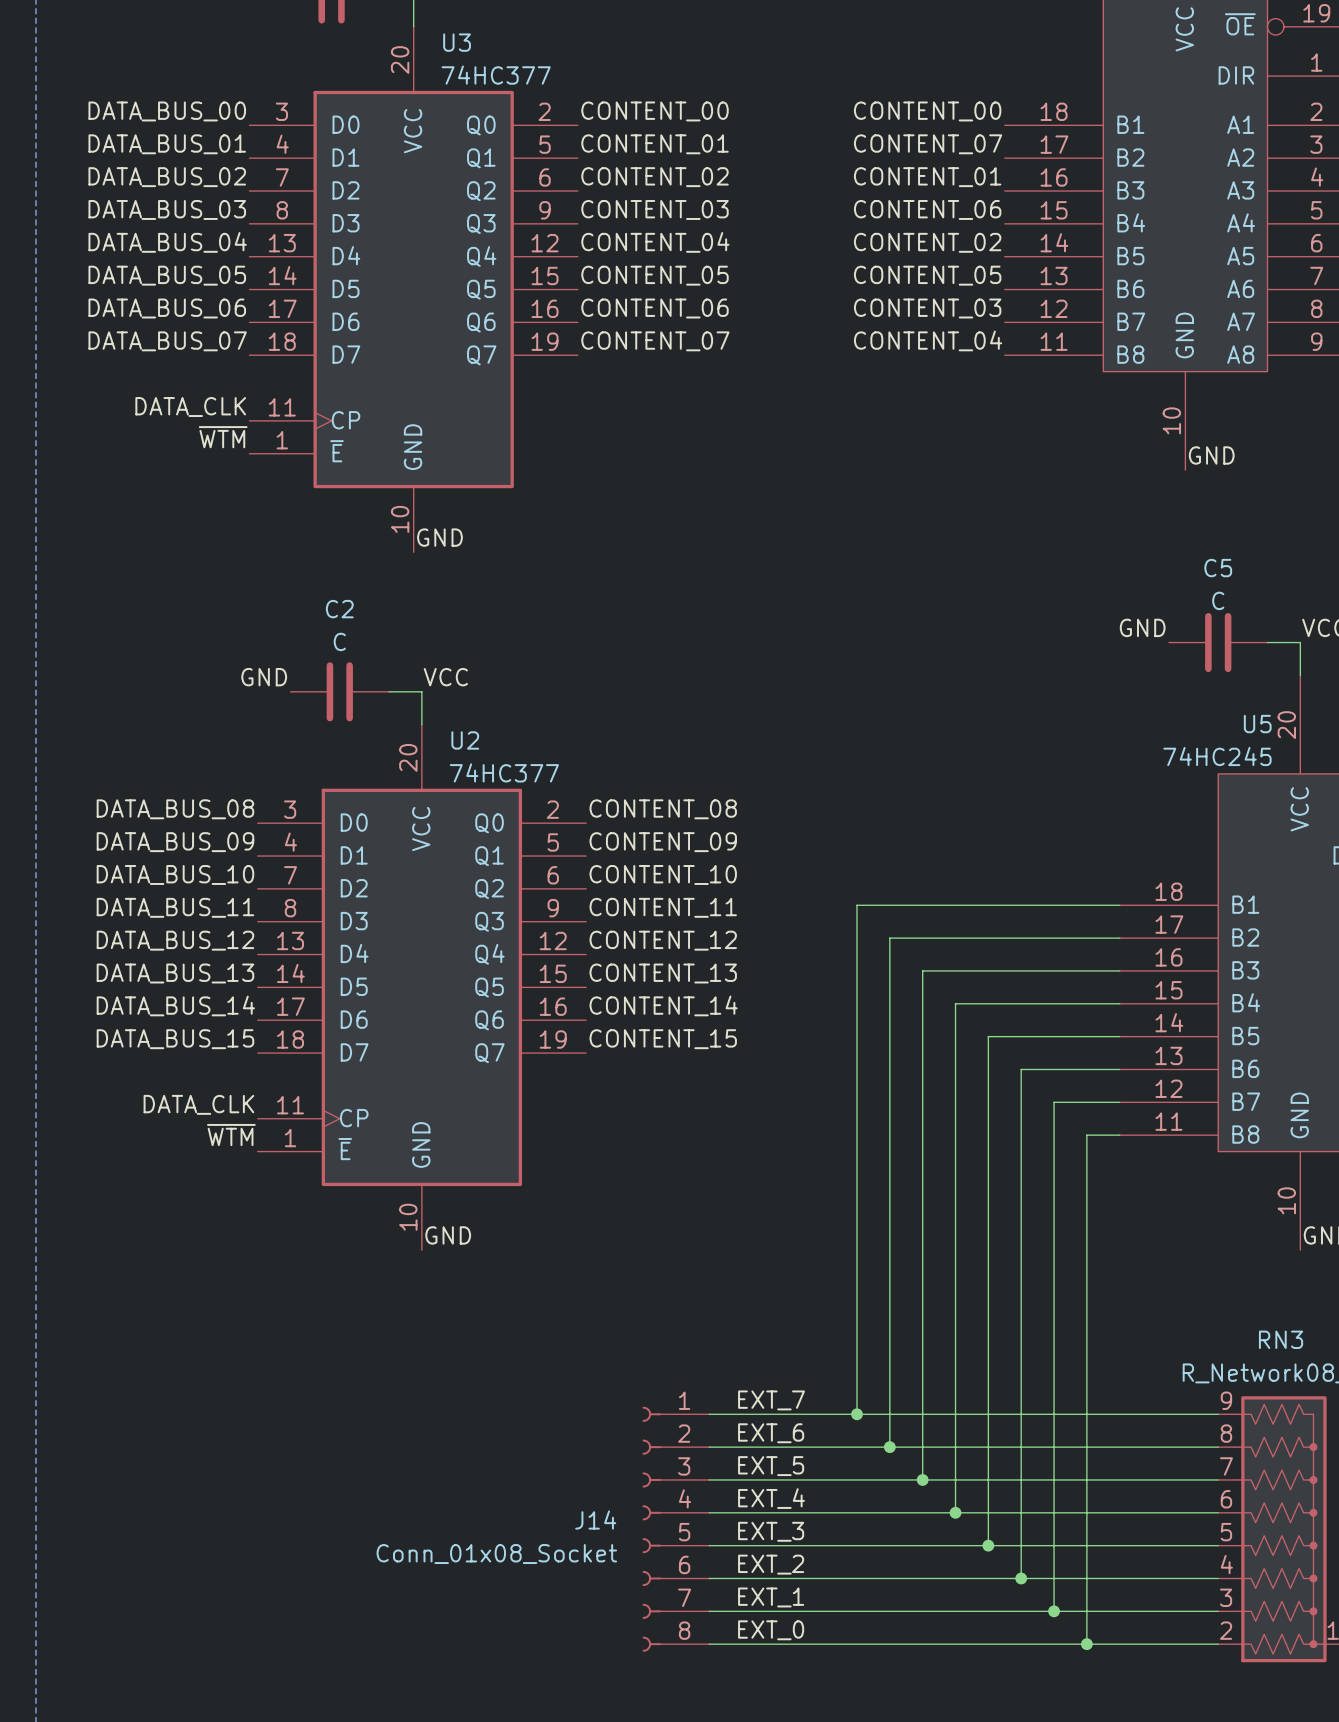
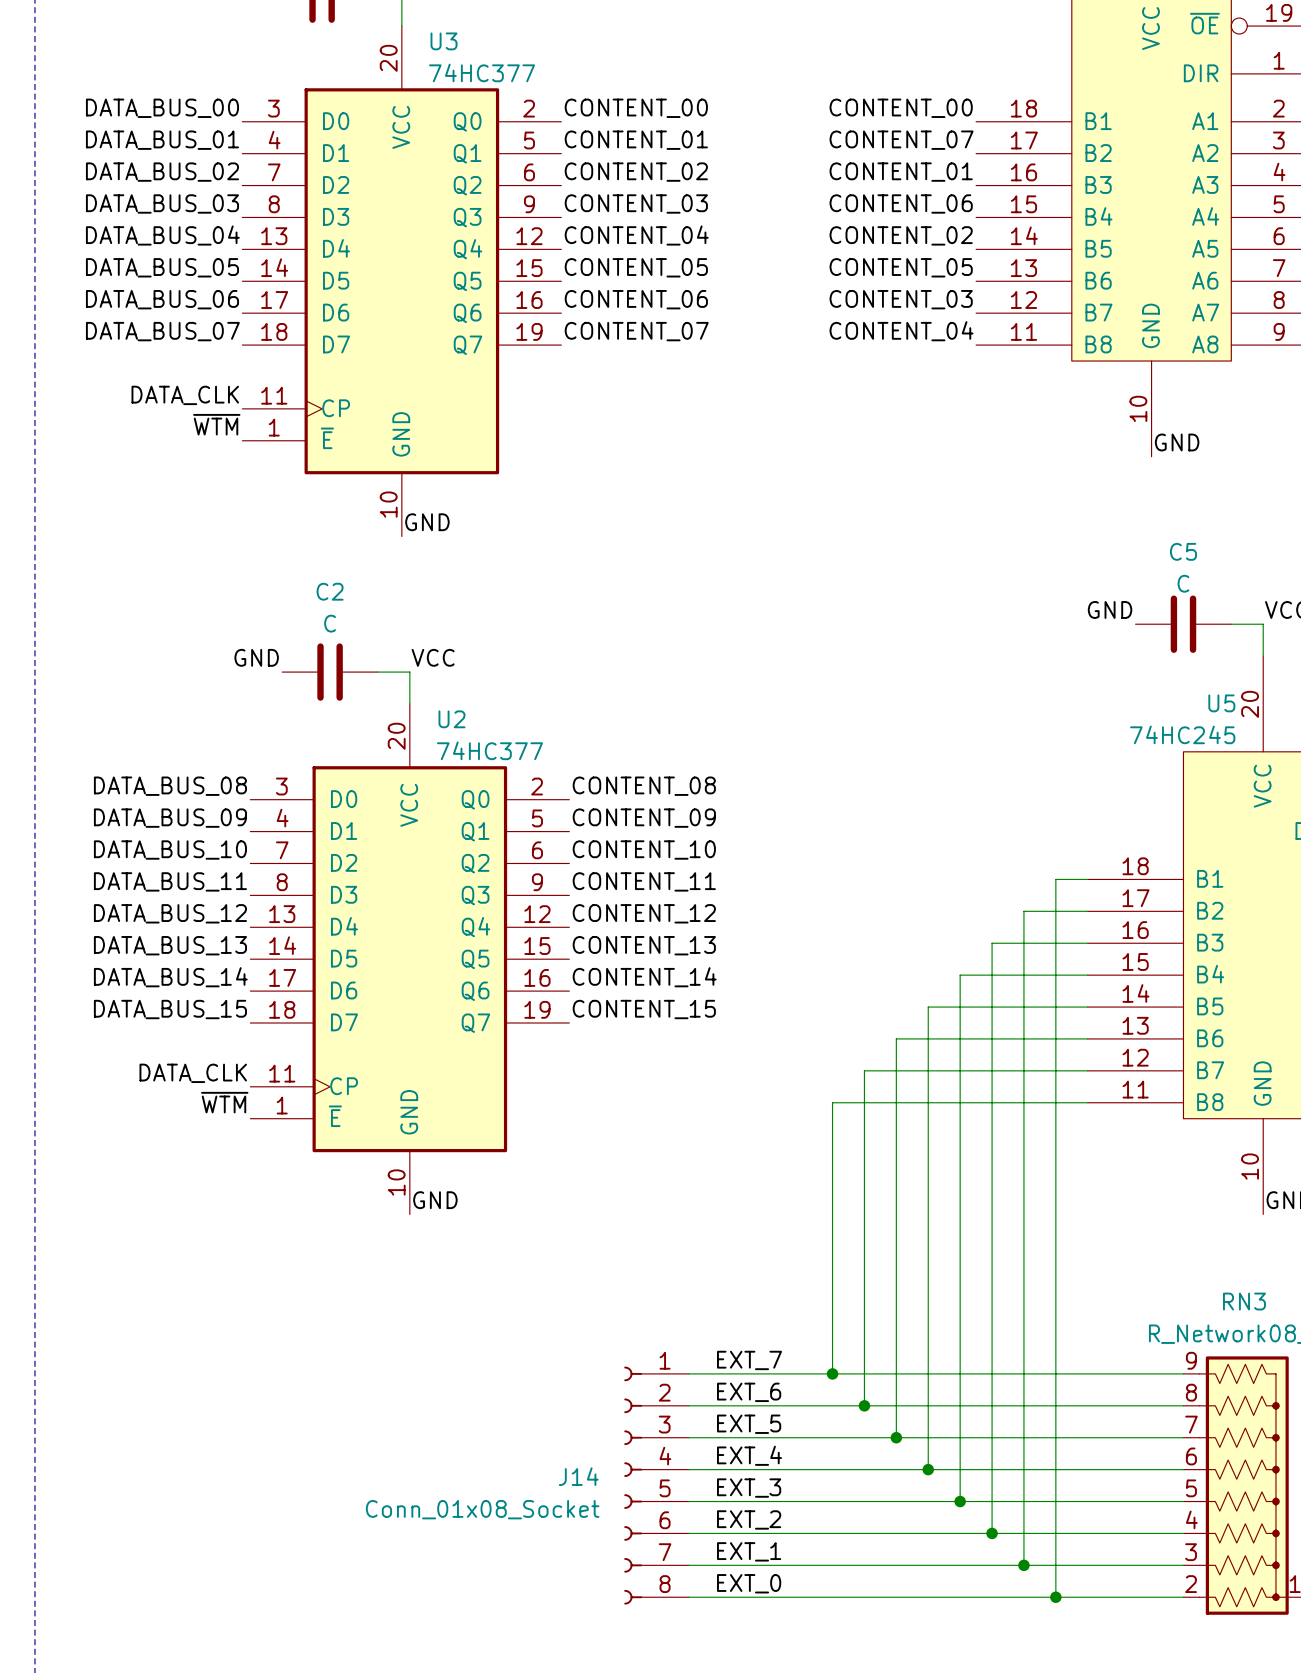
wire: (1086, 905) (857, 905) (857, 1135) -> (1055, 879) (1055, 1102) (832, 1102)
wire: (1054, 938) (889, 938) (889, 1102) -> (1023, 911) (1023, 1070) (864, 1070)
wire: (1021, 970) (922, 970) (922, 1069) -> (992, 943) (992, 1038) (896, 1038)
wire: (988, 1003) (955, 1003) (955, 1036) -> (960, 975) (960, 1007) (928, 1007)

